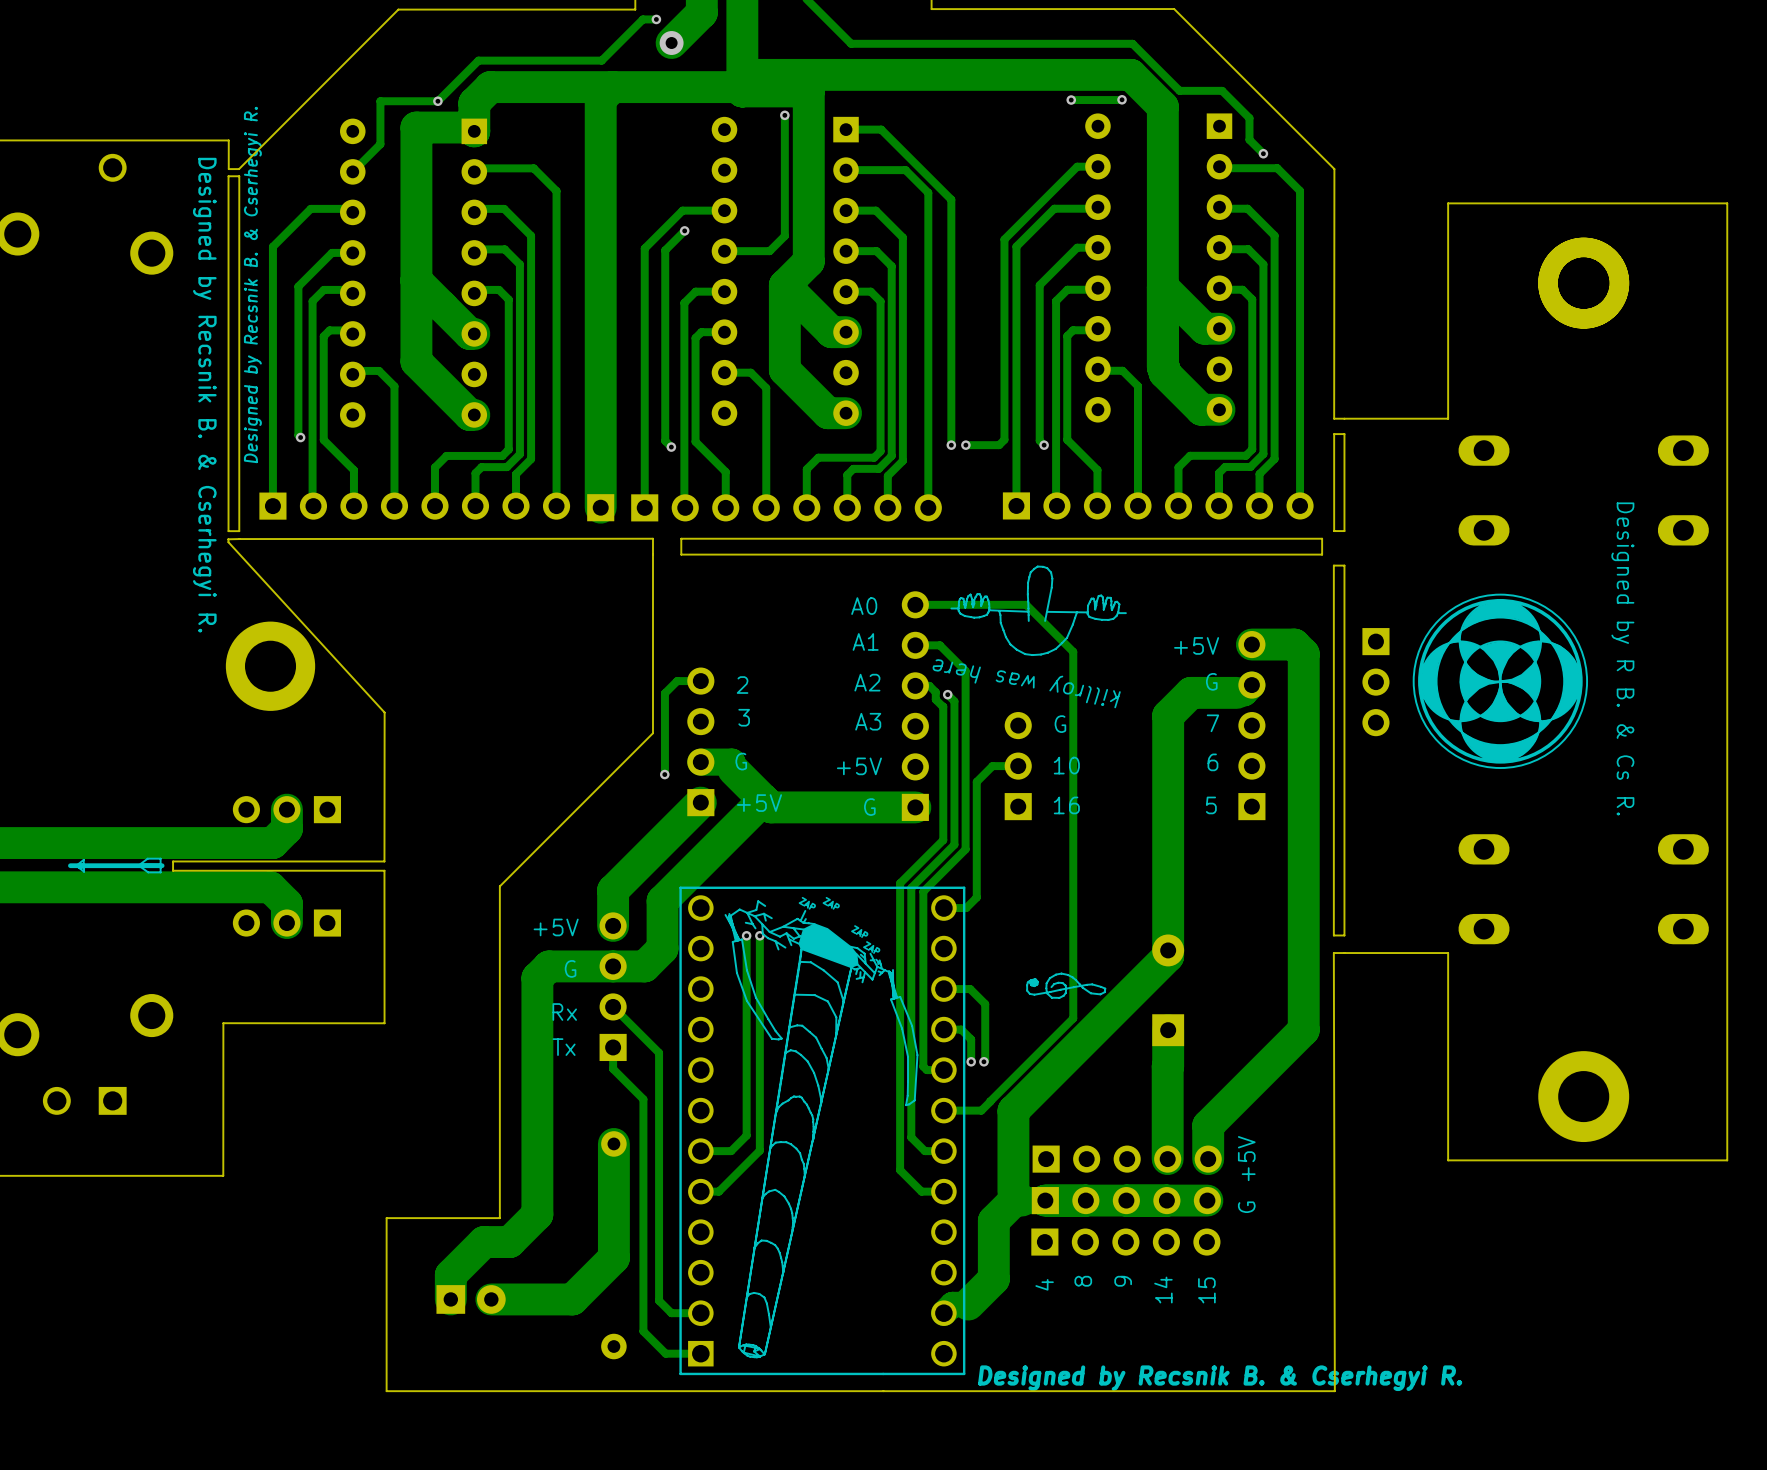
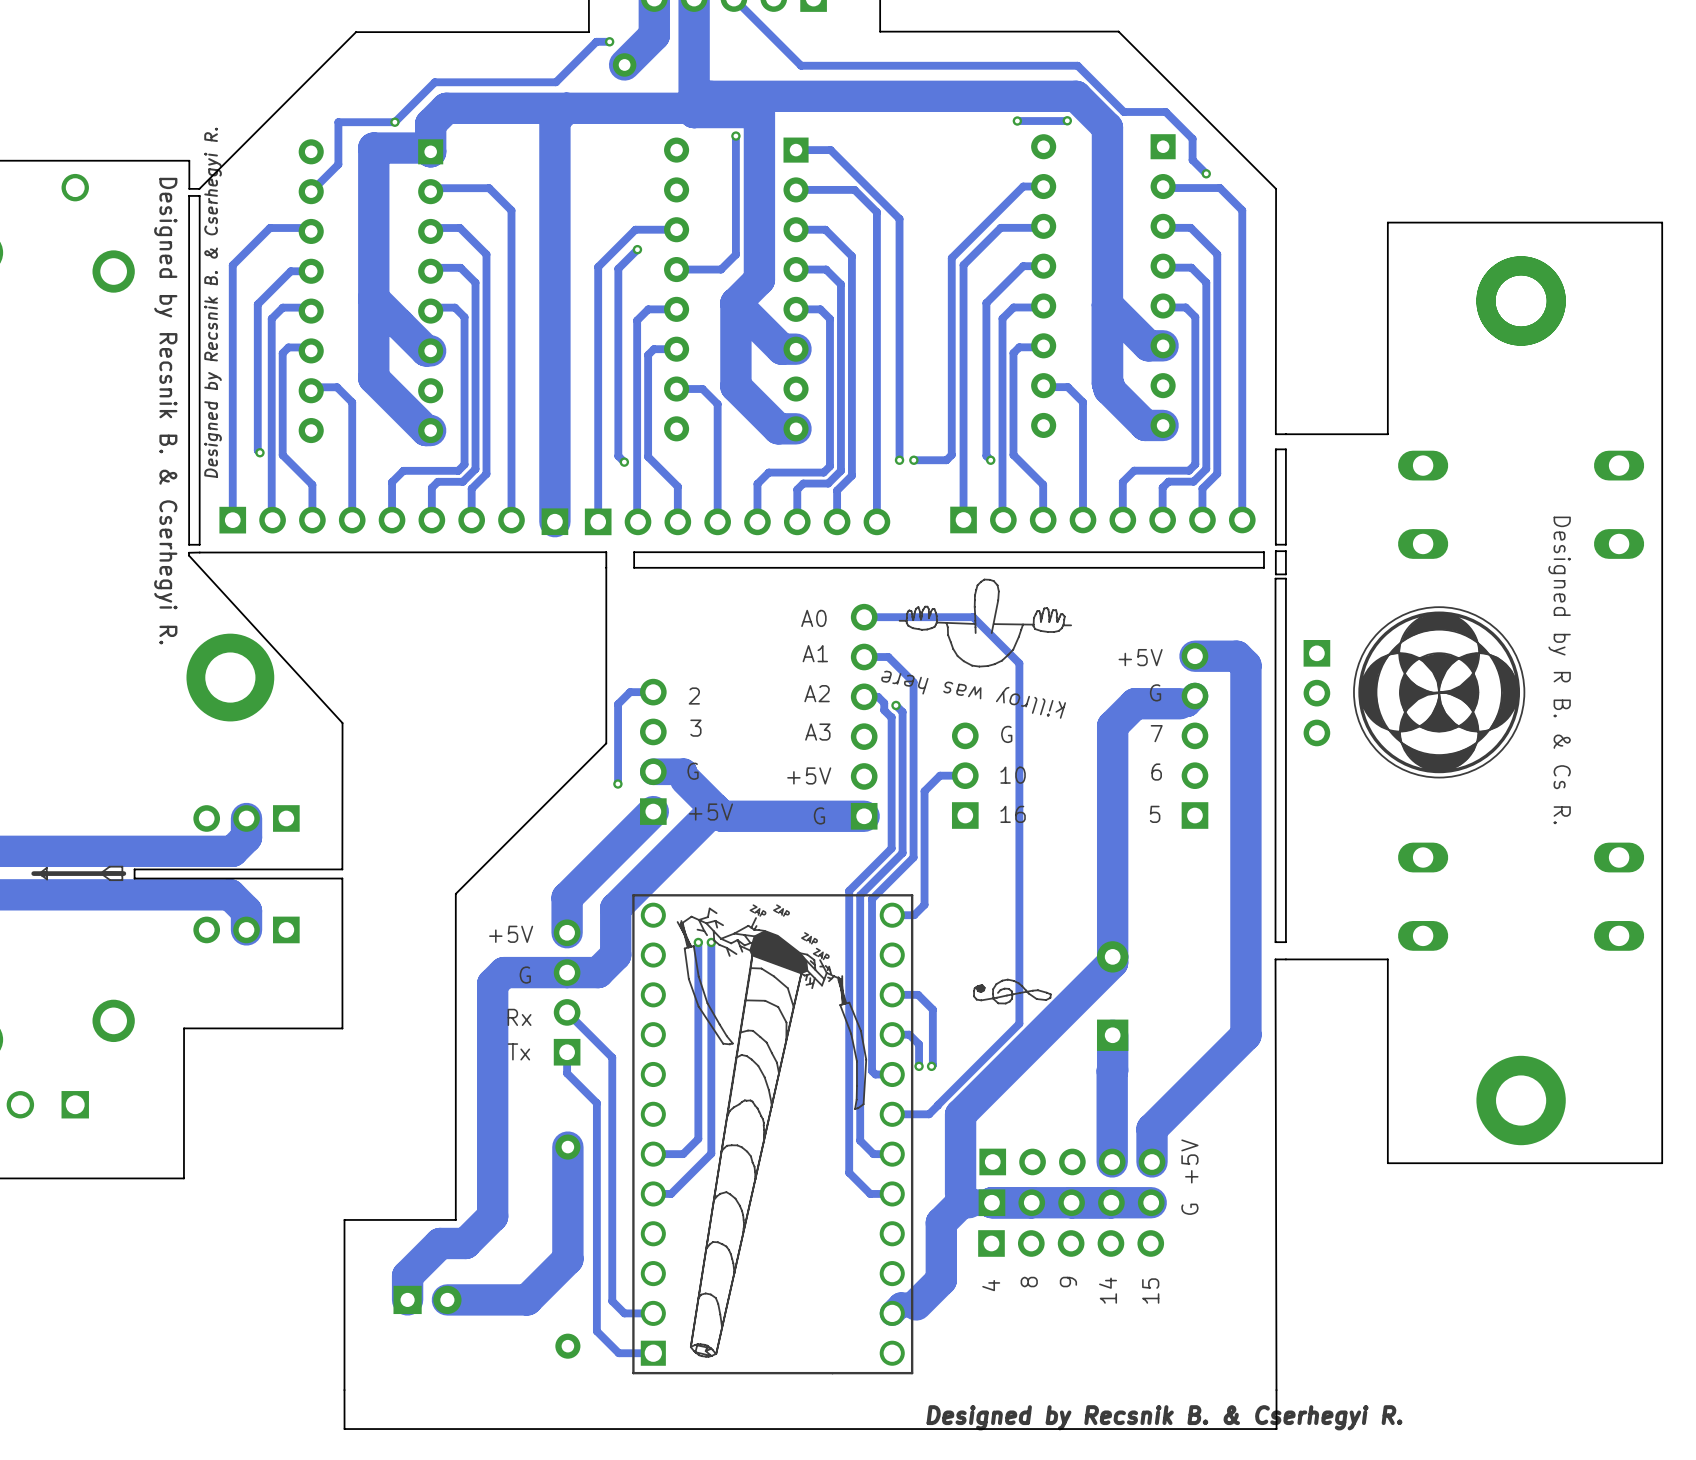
board edge: none -> (1285, 551) (1285, 574) (1275, 574) (1275, 551) (1285, 551)
text position: Designed by Recsnik B. & Cserhegyi R. (1220, 1378) -> Designed by Recsnik B. & Cserhegyi R. (1164, 1417)
board edge: (1334, 1391) (386, 1391) -> (1276, 1390) (1276, 1429) (344, 1429) (344, 1390)

